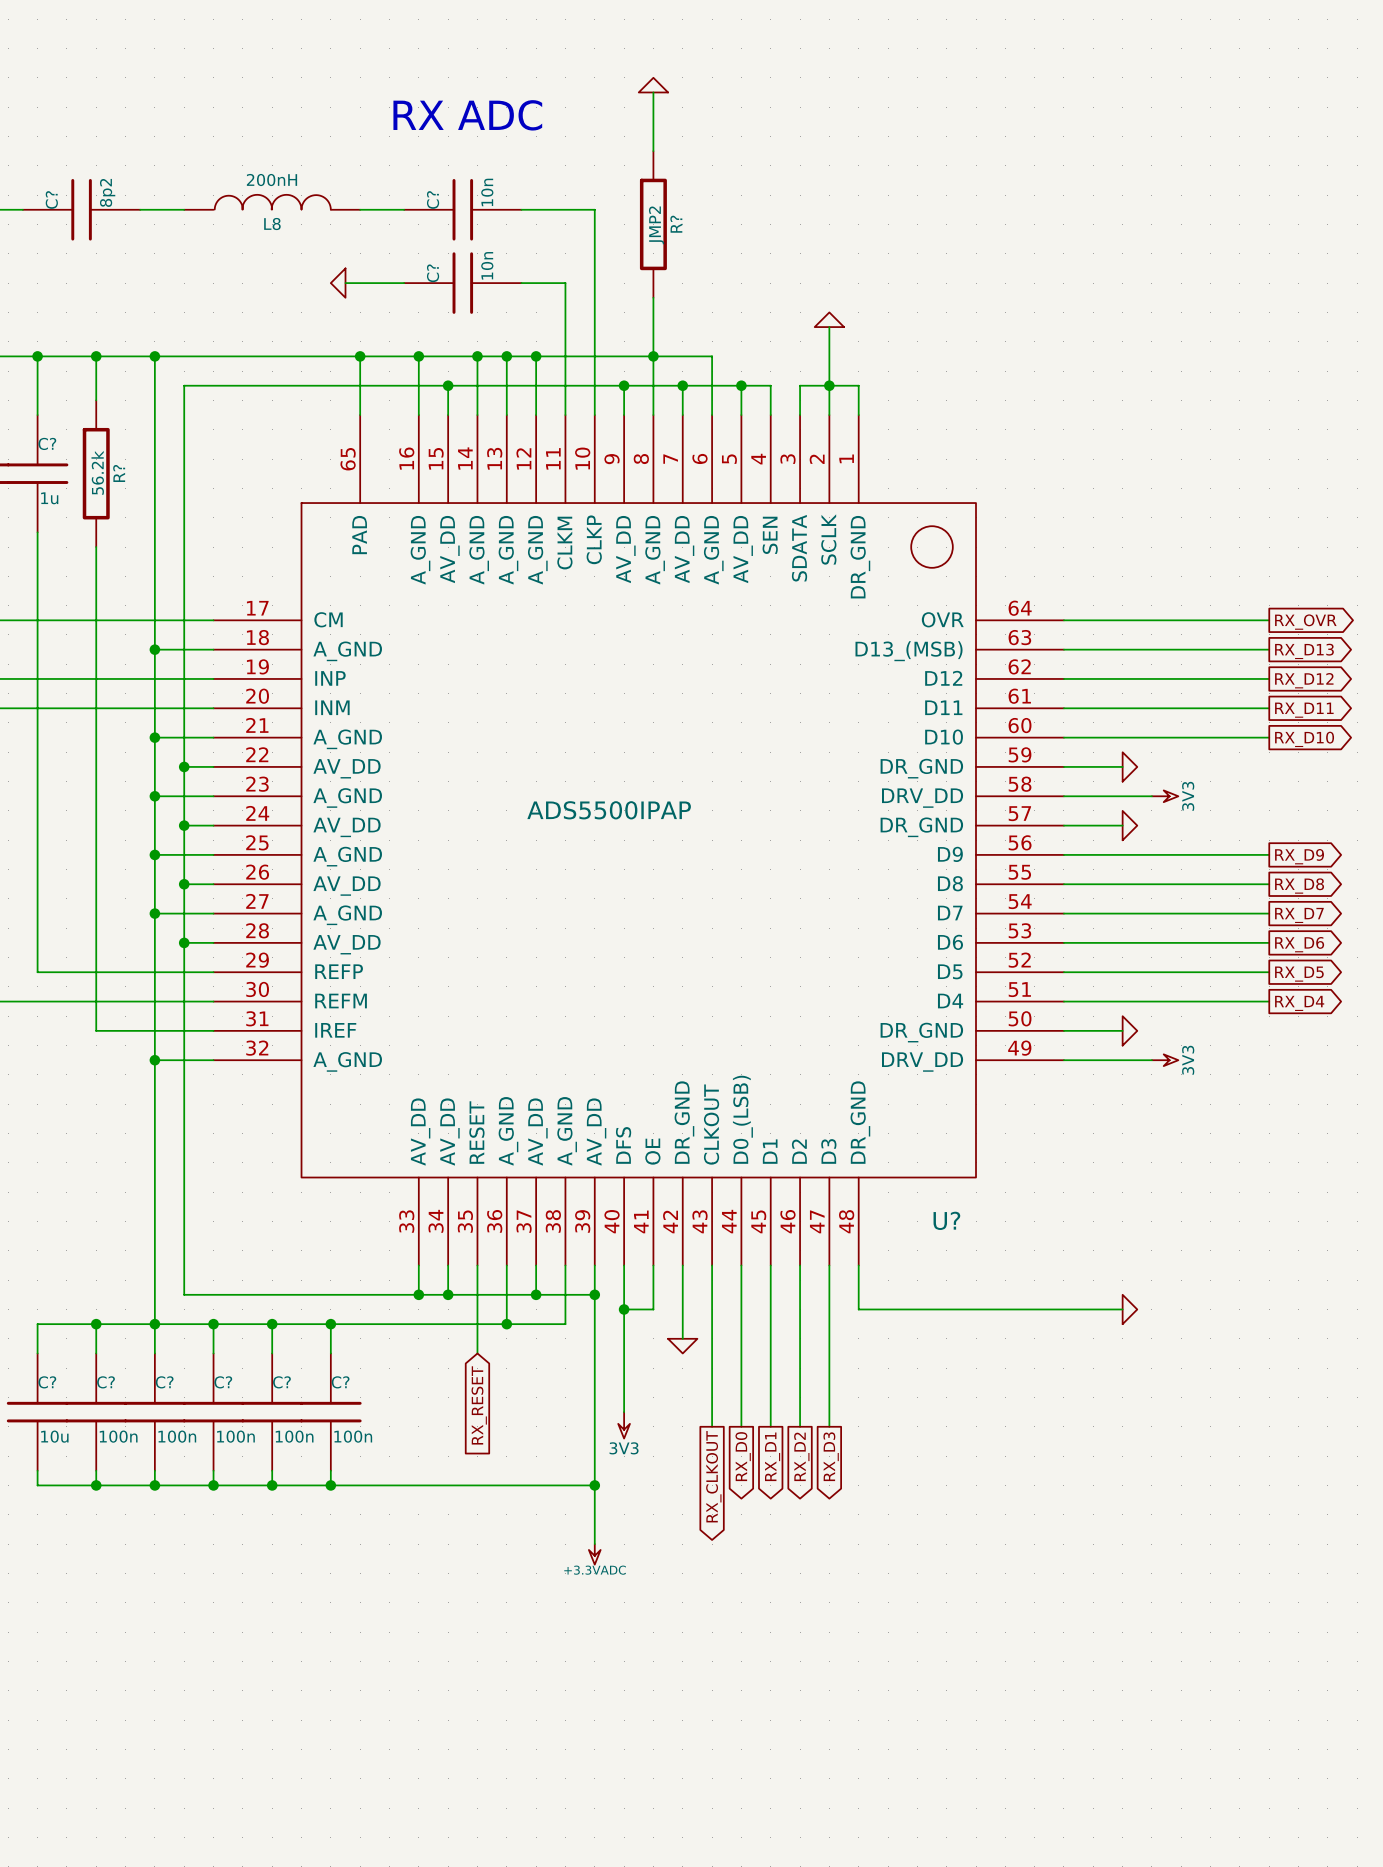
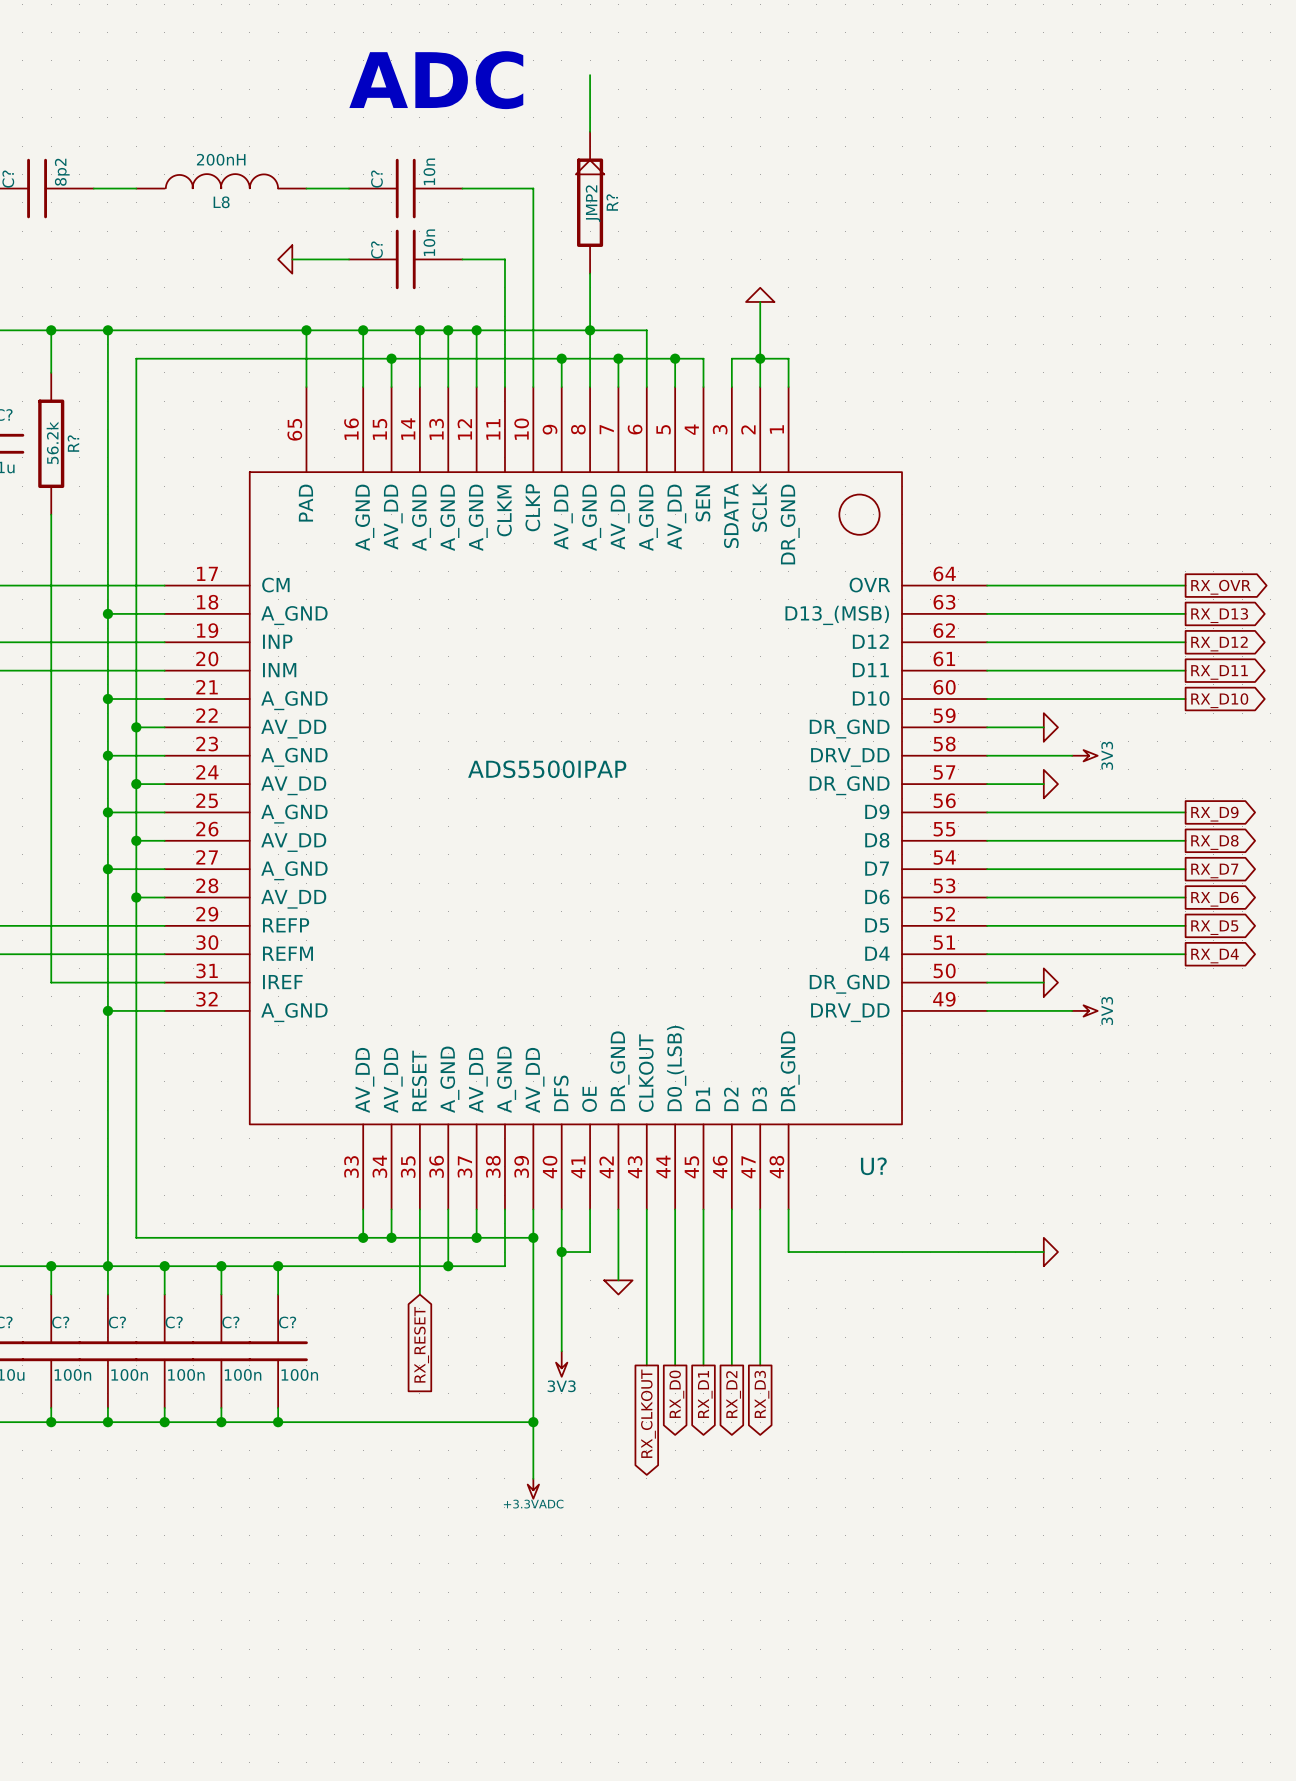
power symbol position: (653, 85) -> (590, 167)
text: RX ADC (467, 115) -> ADC (436, 80)

